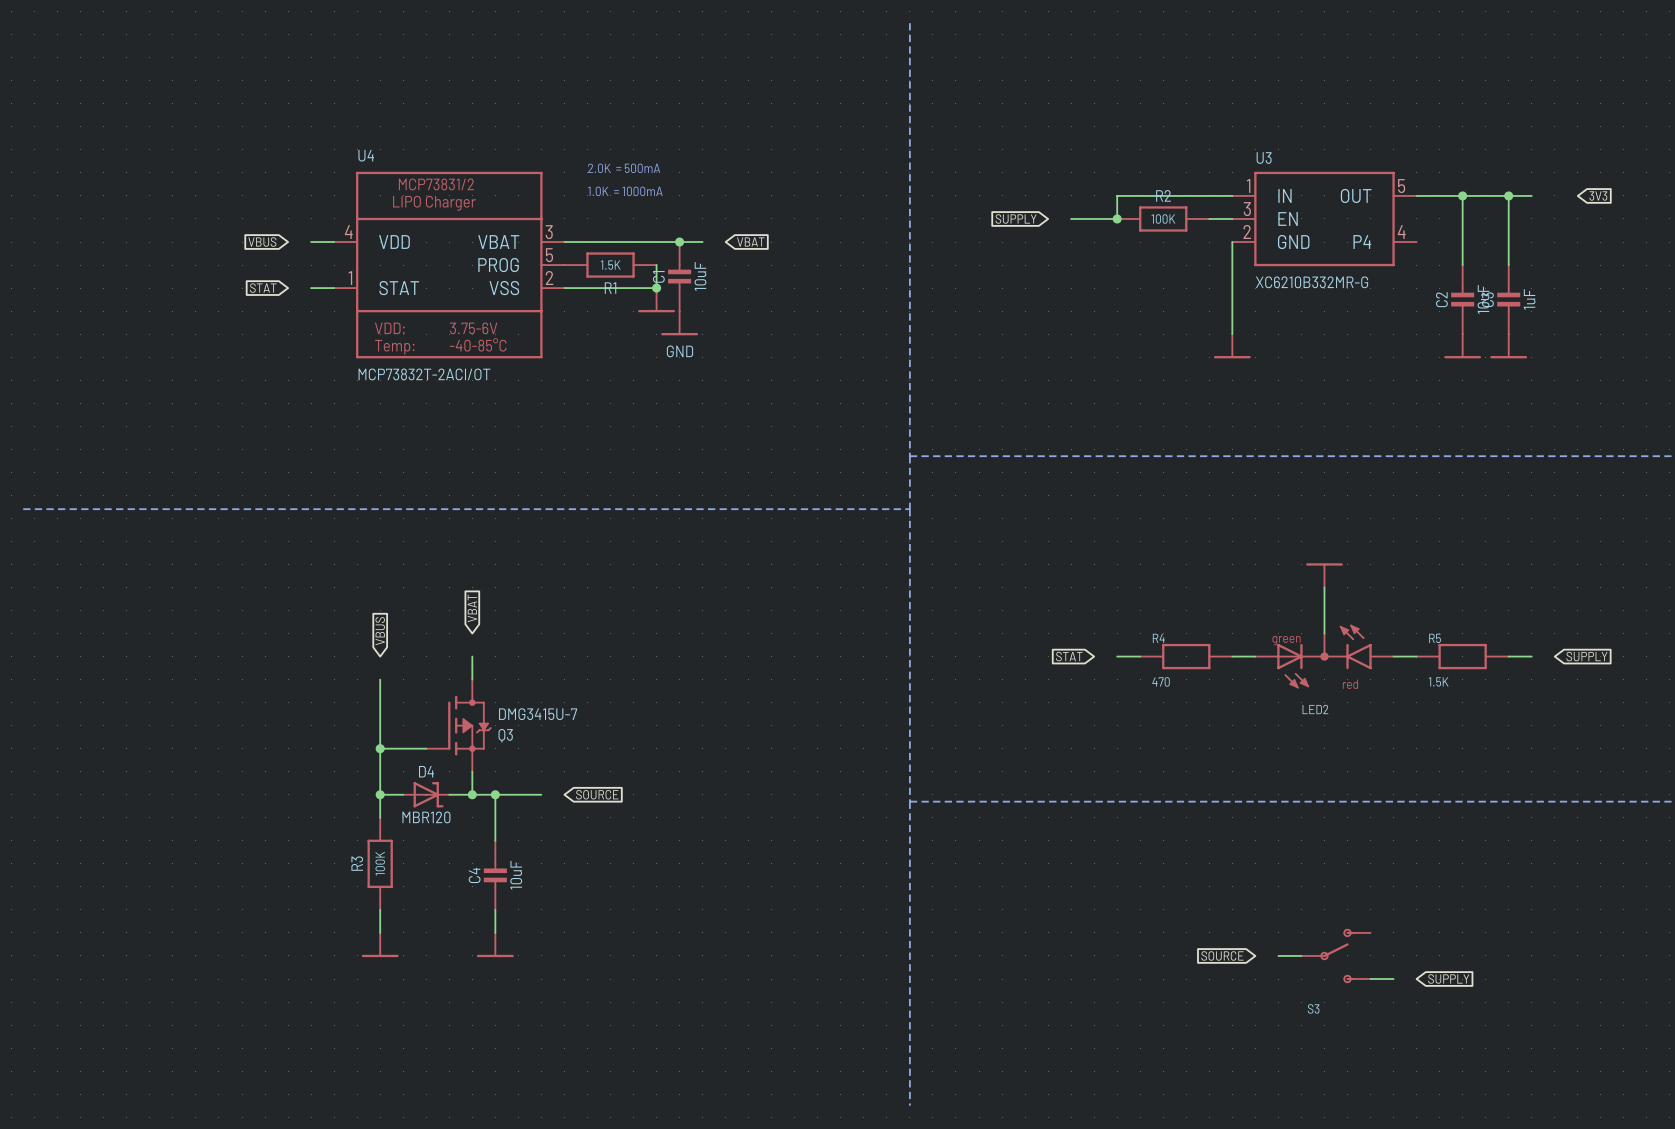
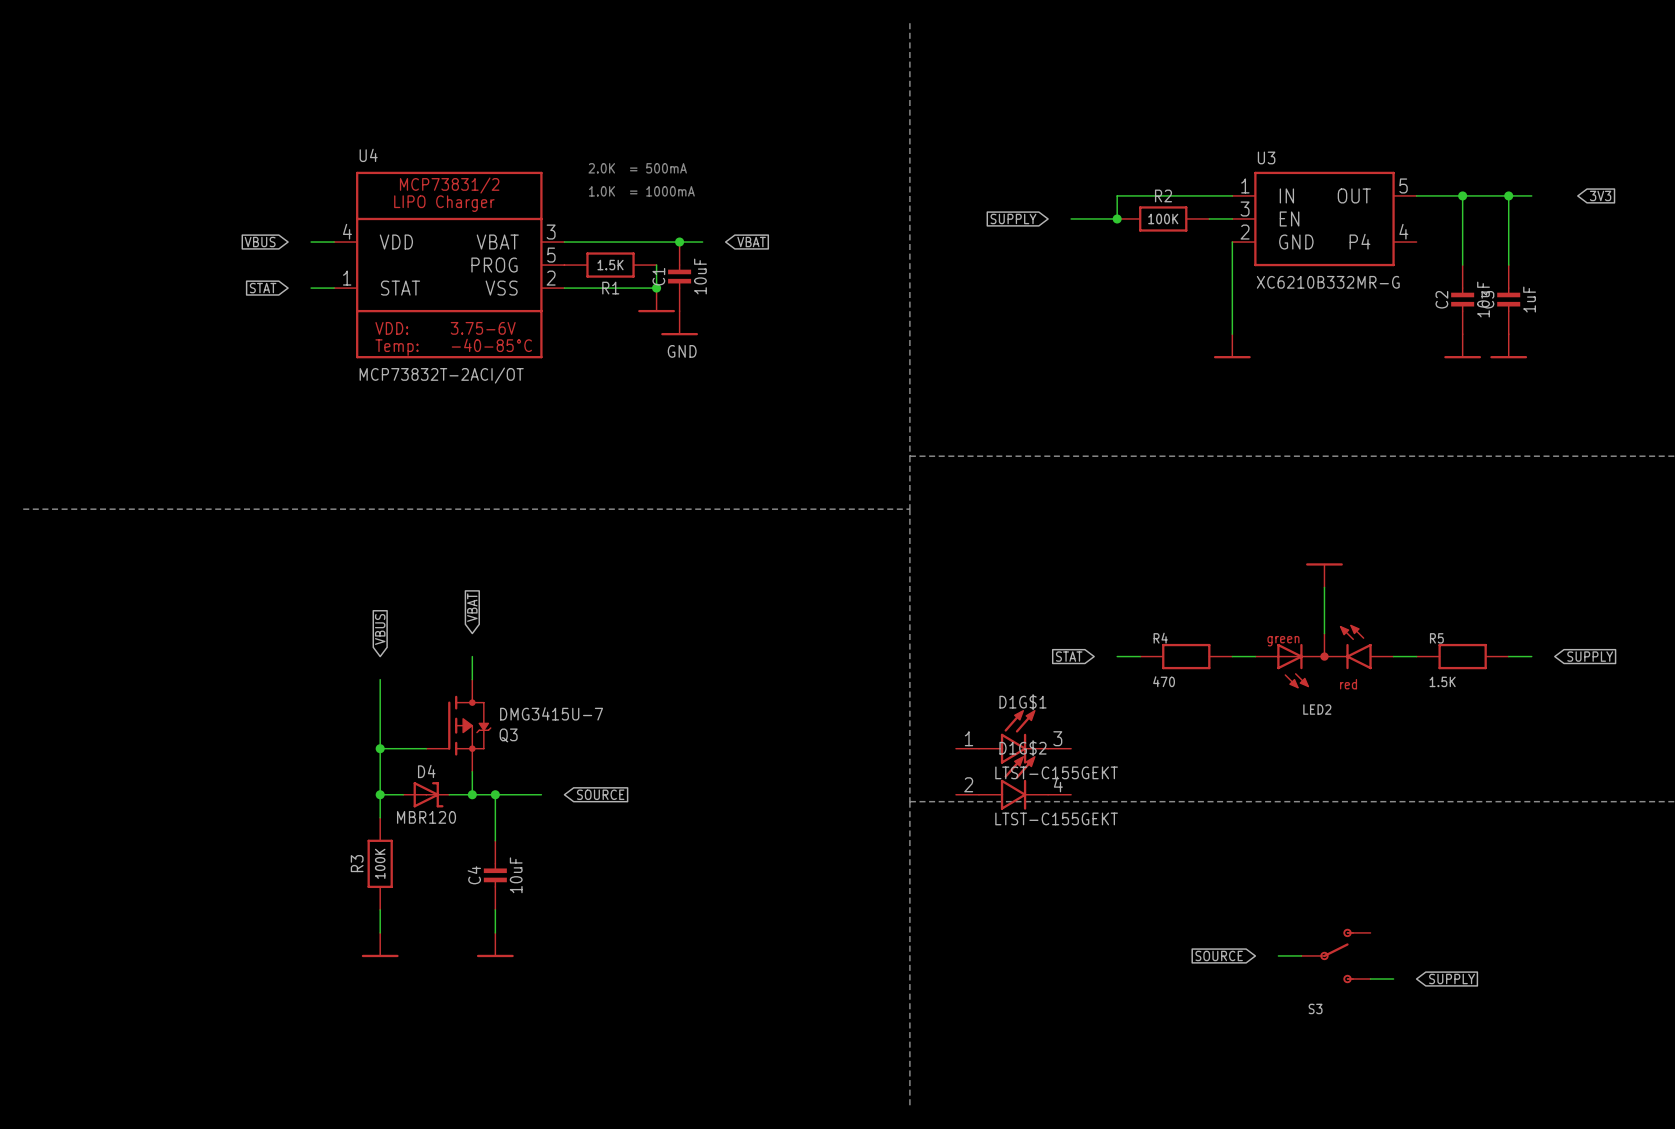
D1G$1: none -> LTST-C155GEKT (1013, 736)
D1G$2: none -> LTST-C155GEKT (1013, 782)

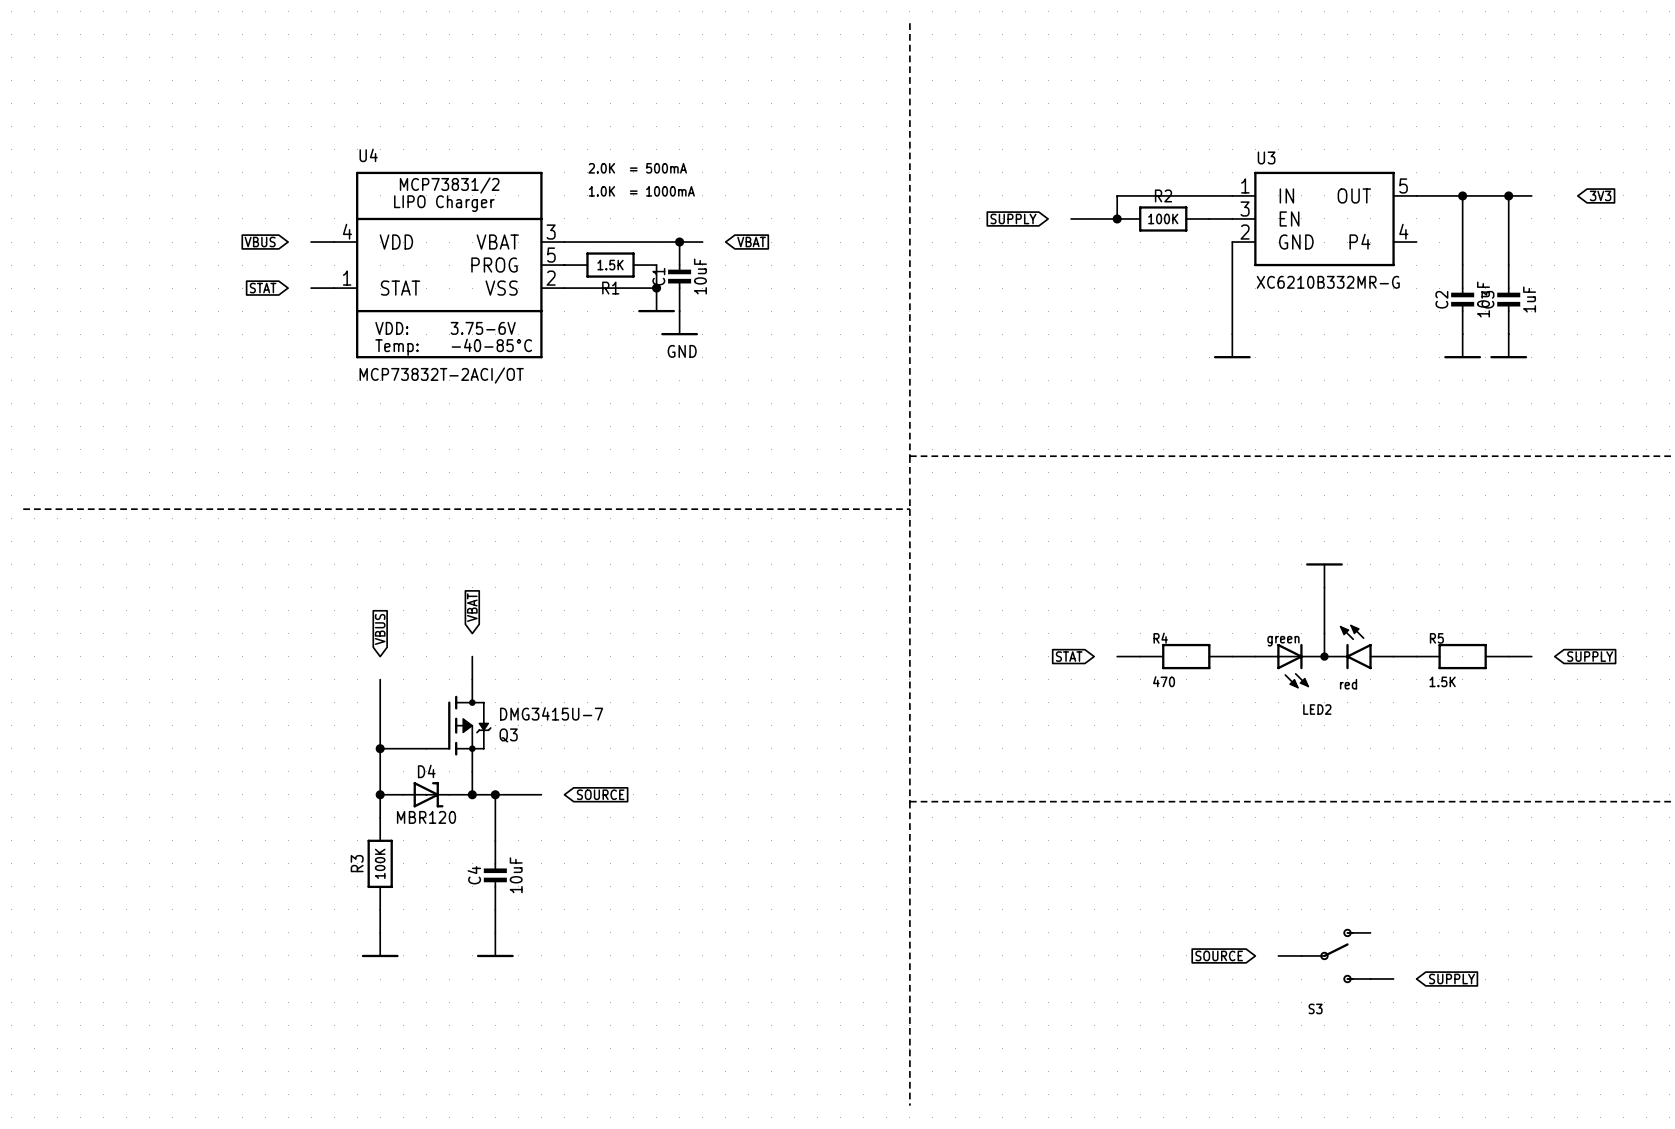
D1G$1: LTST-C155GEKT (1013, 736) -> none
D1G$2: LTST-C155GEKT (1013, 782) -> none

